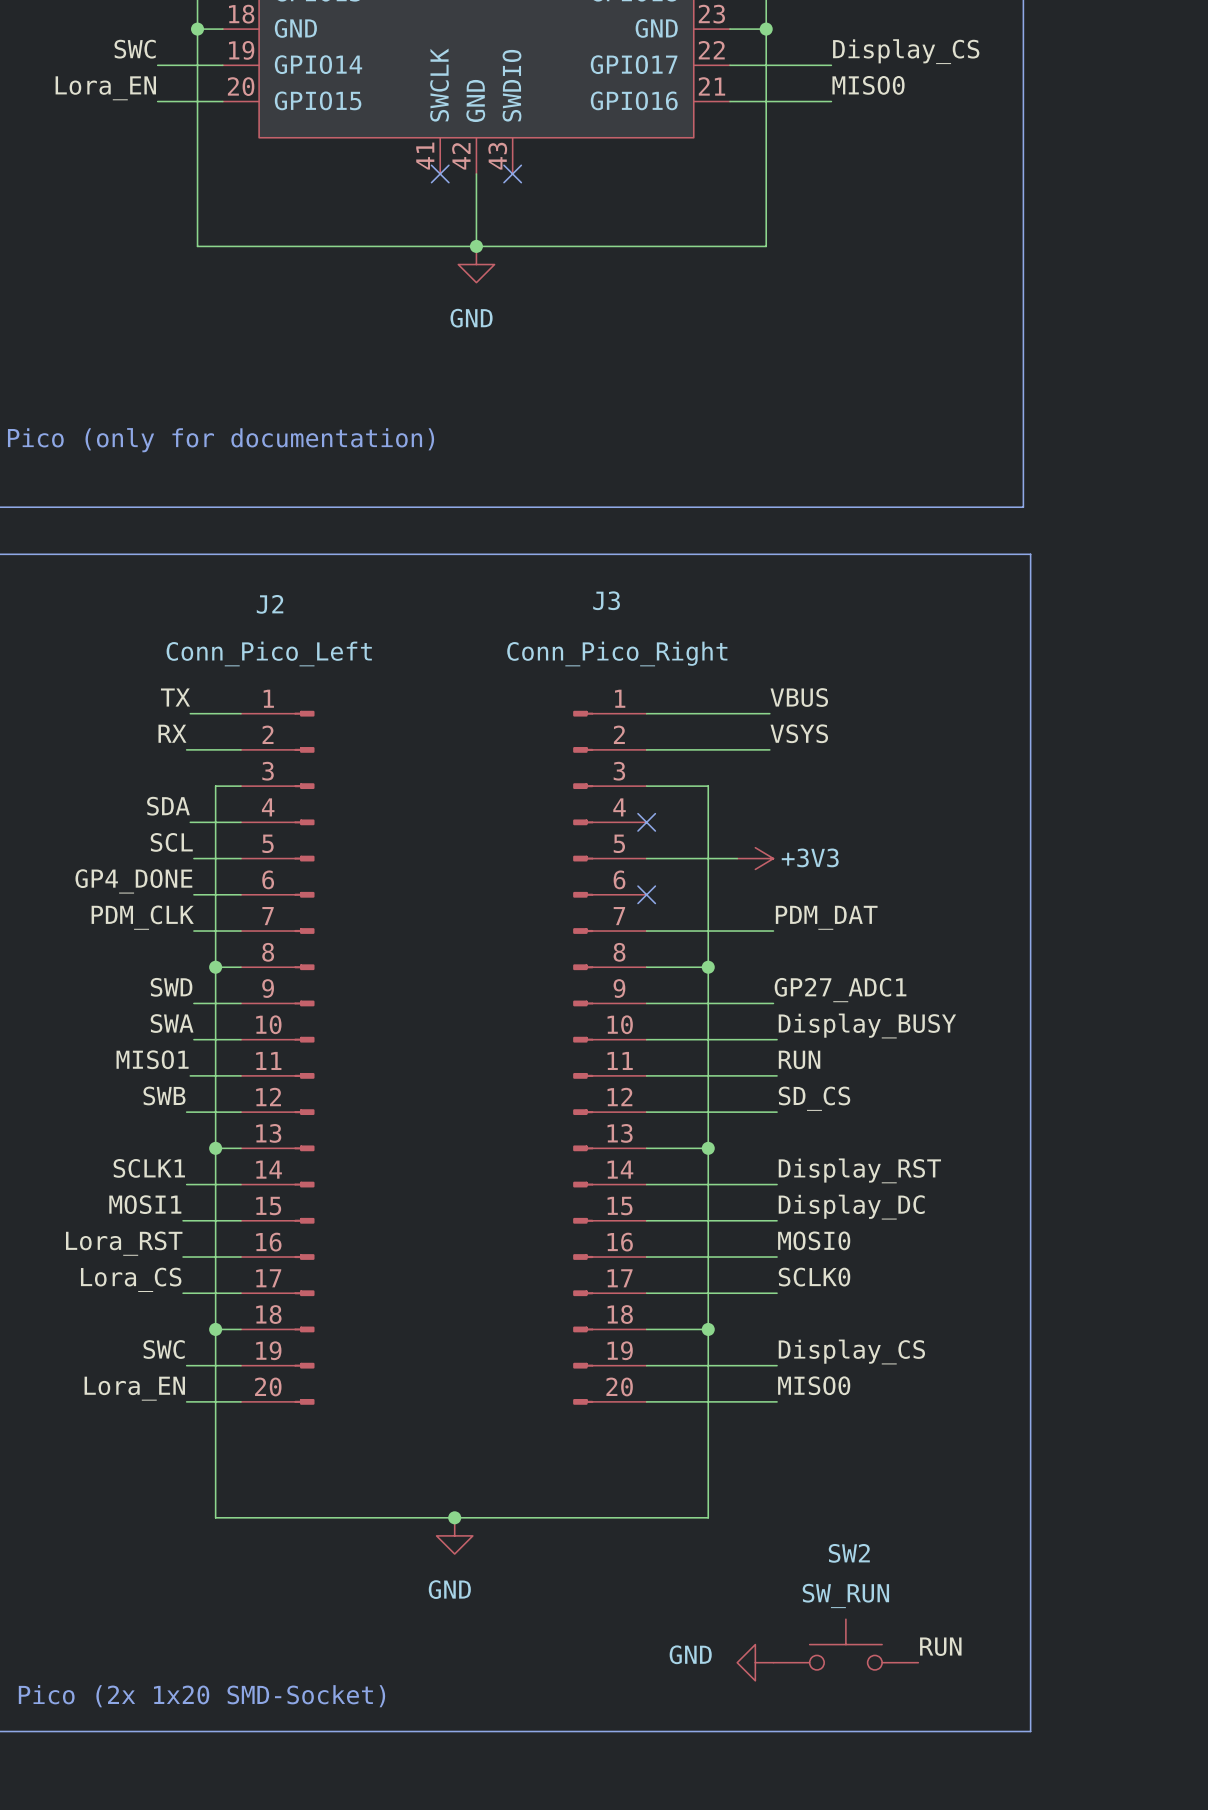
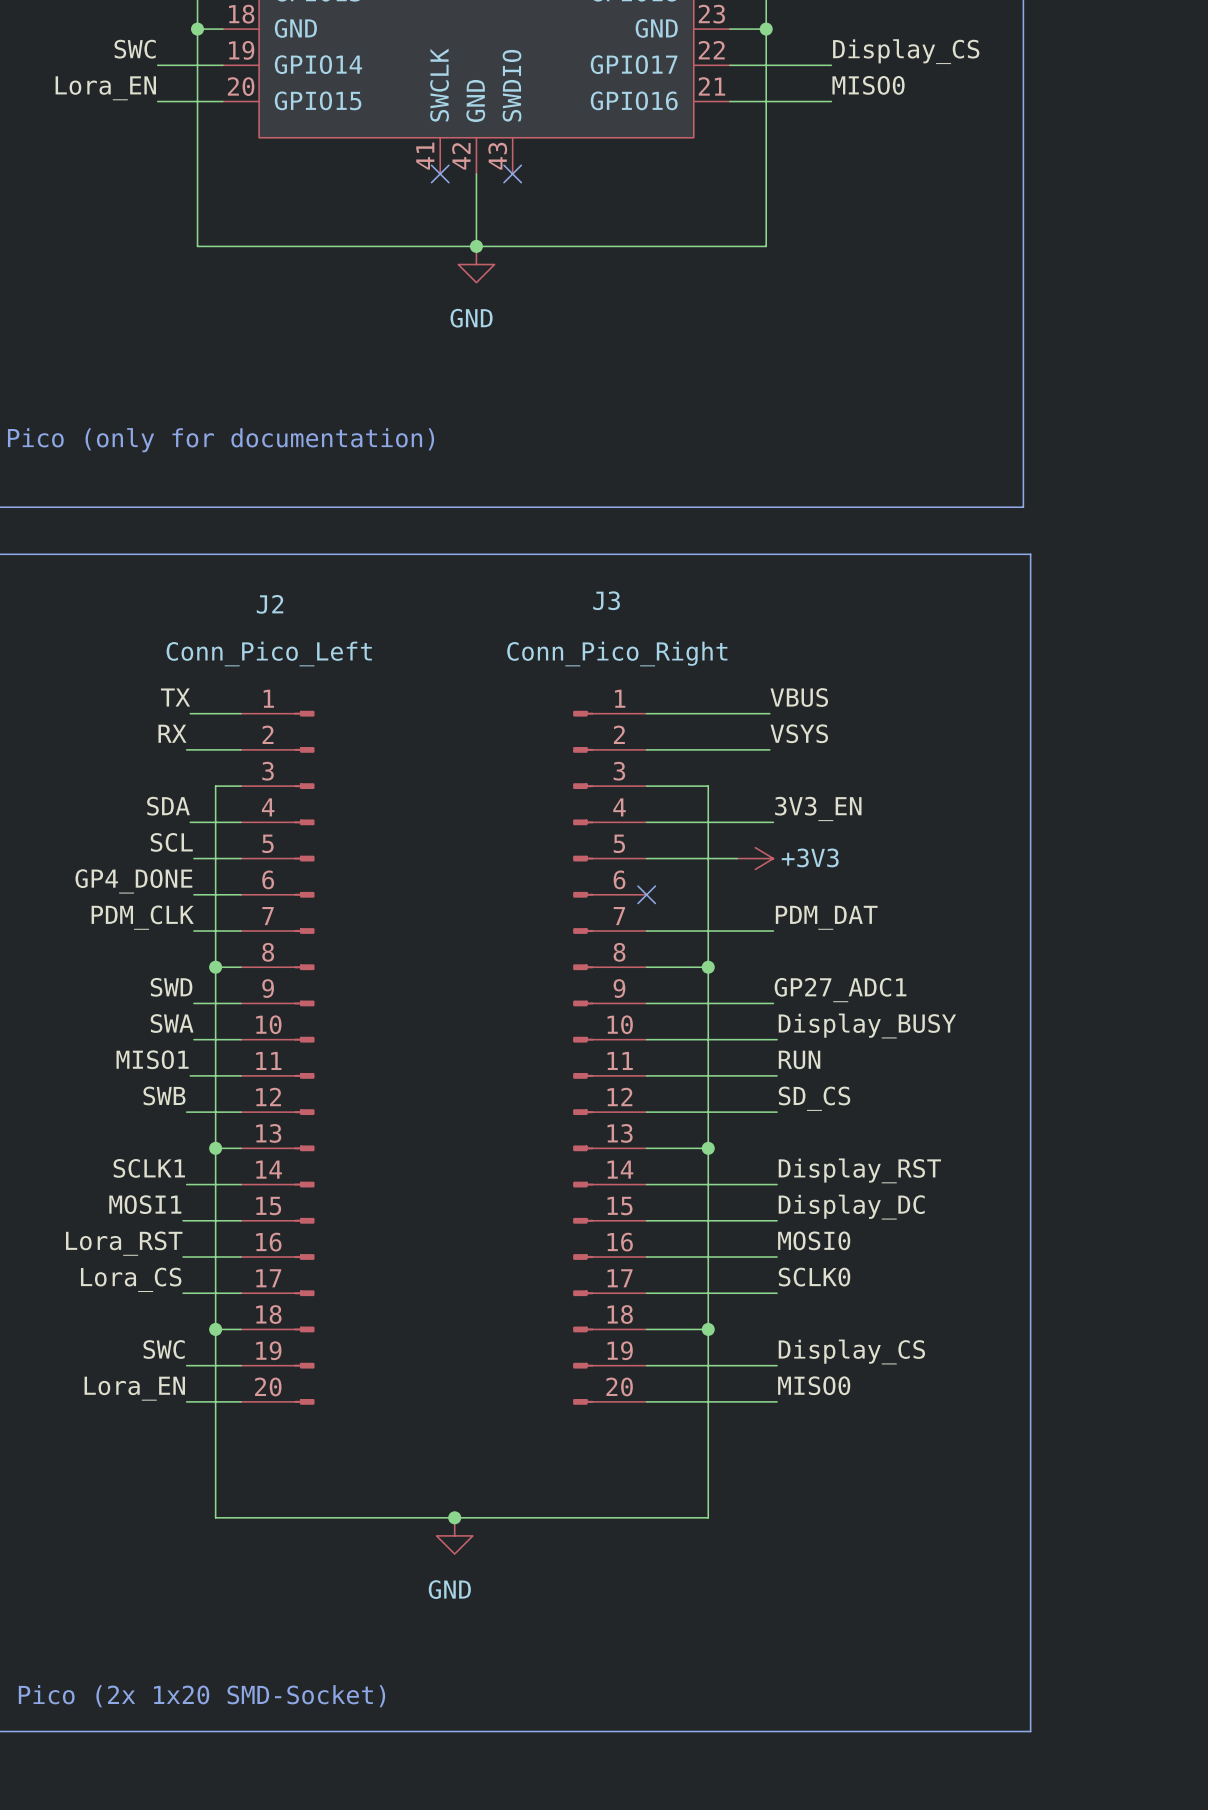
label: none -> 3V3_EN (818, 808)
wire: none -> (646, 822) (773, 822)
no-connect mark: (646, 822) -> none
SW2: SW_RUN (845, 1644) -> none
label: RUN (940, 1646) -> none
power symbol: GND (755, 1662) -> none

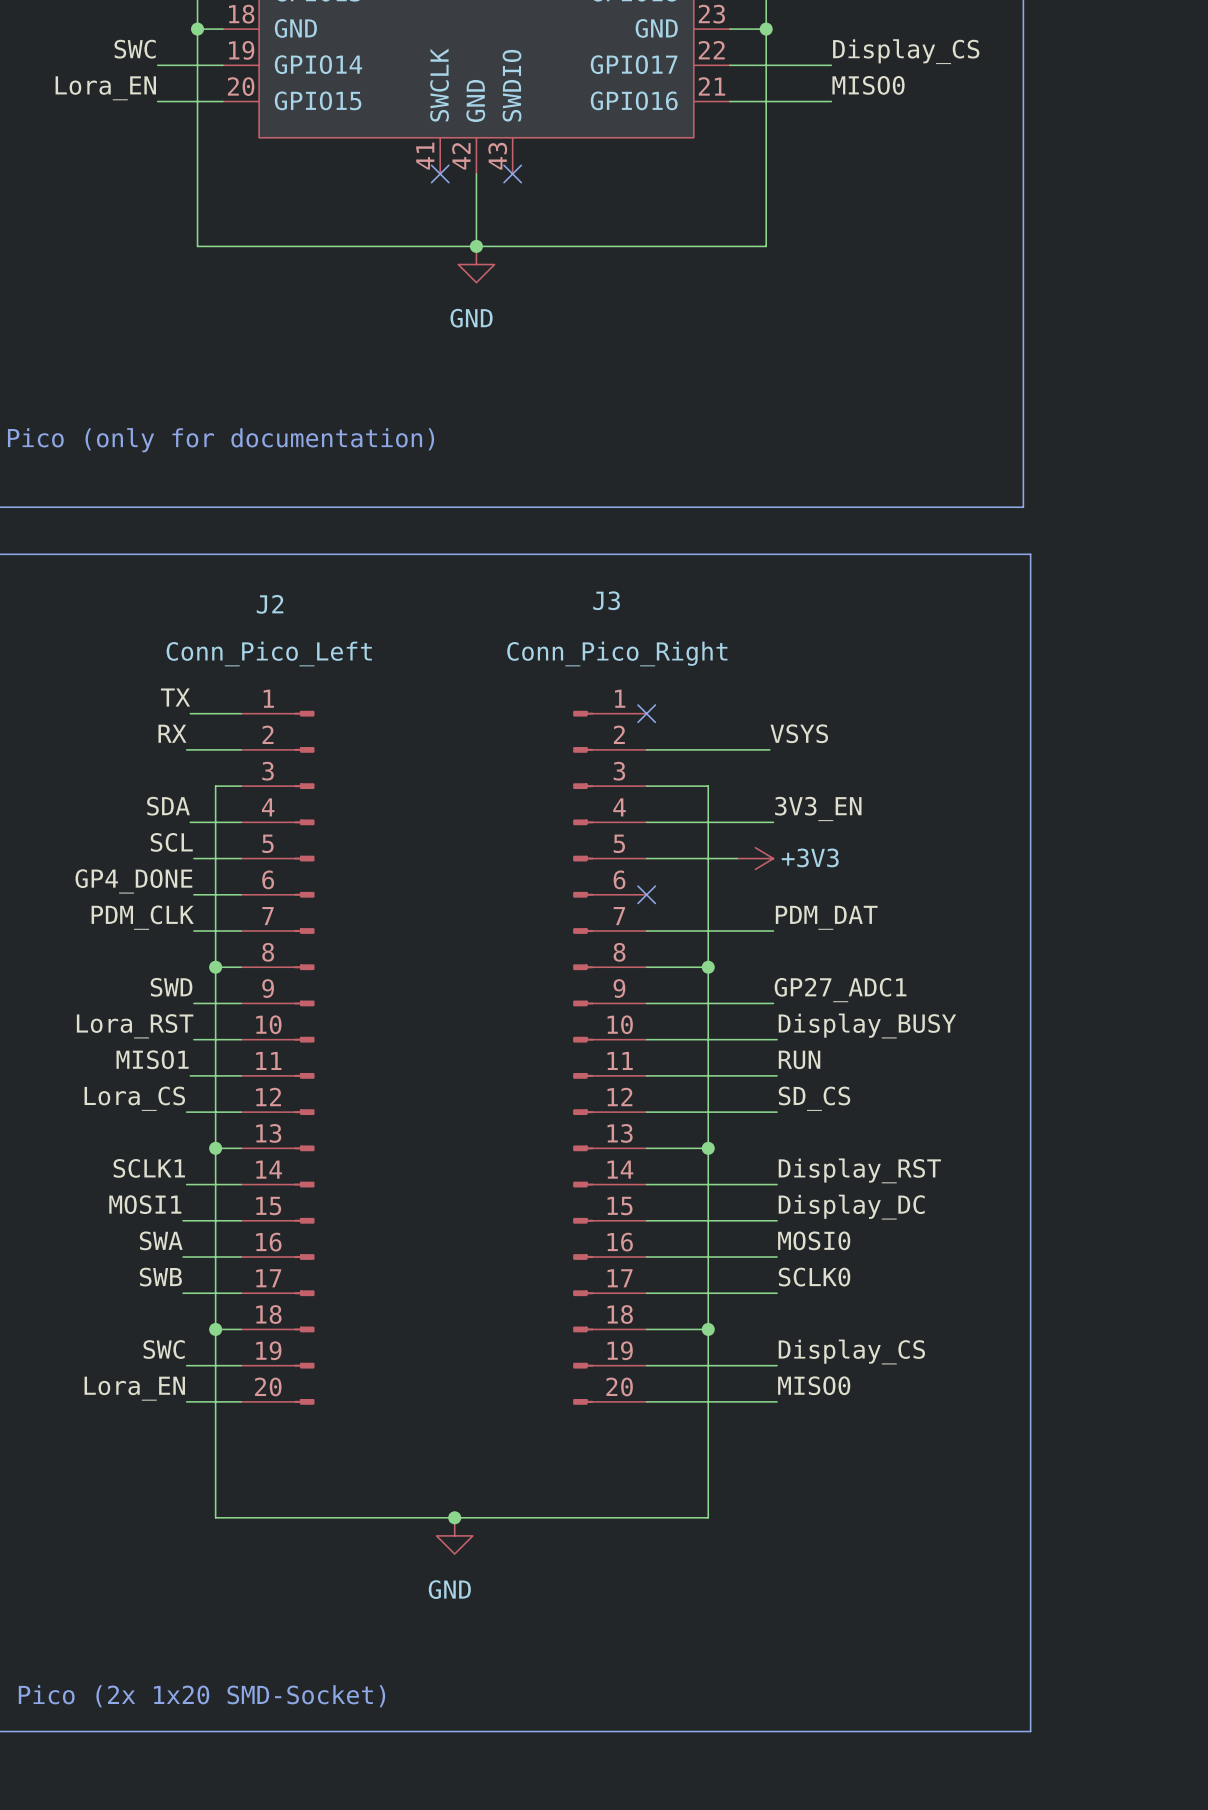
label: VBUS (799, 697) -> none
wire: (646, 713) (769, 713) -> none
no-connect mark: none -> (646, 713)
label: SWA (172, 1023) -> Lora_RST (135, 1026)
label: SWB (164, 1095) -> Lora_CS (134, 1098)
label: Lora_RST (124, 1243) -> SWA (161, 1240)
label: Lora_CS (131, 1279) -> SWB (160, 1277)

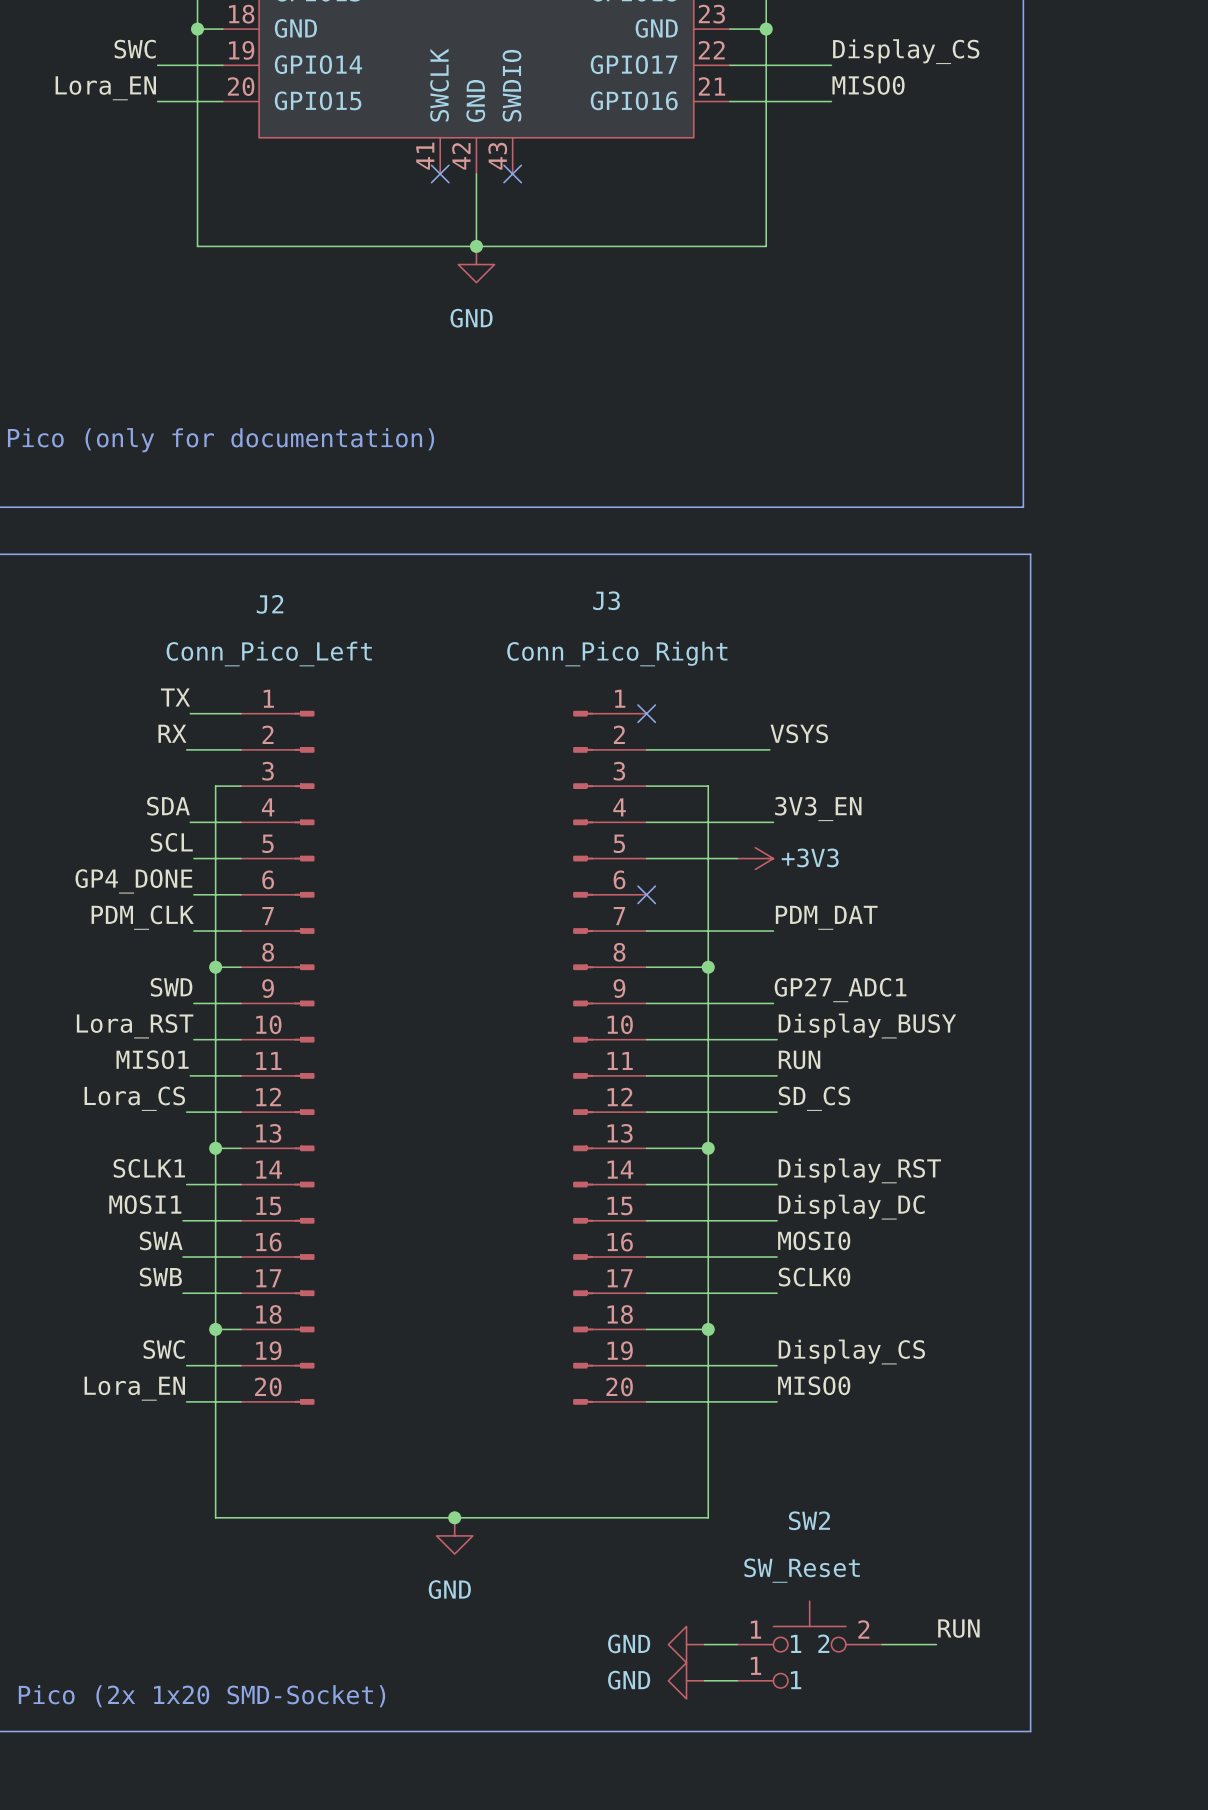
label: none -> RUN (958, 1628)
power symbol: none -> GND (686, 1644)
wire: none -> (704, 1644) (737, 1644)
SW2: none -> SW_Reset (809, 1644)
wire: none -> (882, 1644) (936, 1644)
power symbol: none -> GND (686, 1680)
wire: none -> (704, 1680) (737, 1680)

